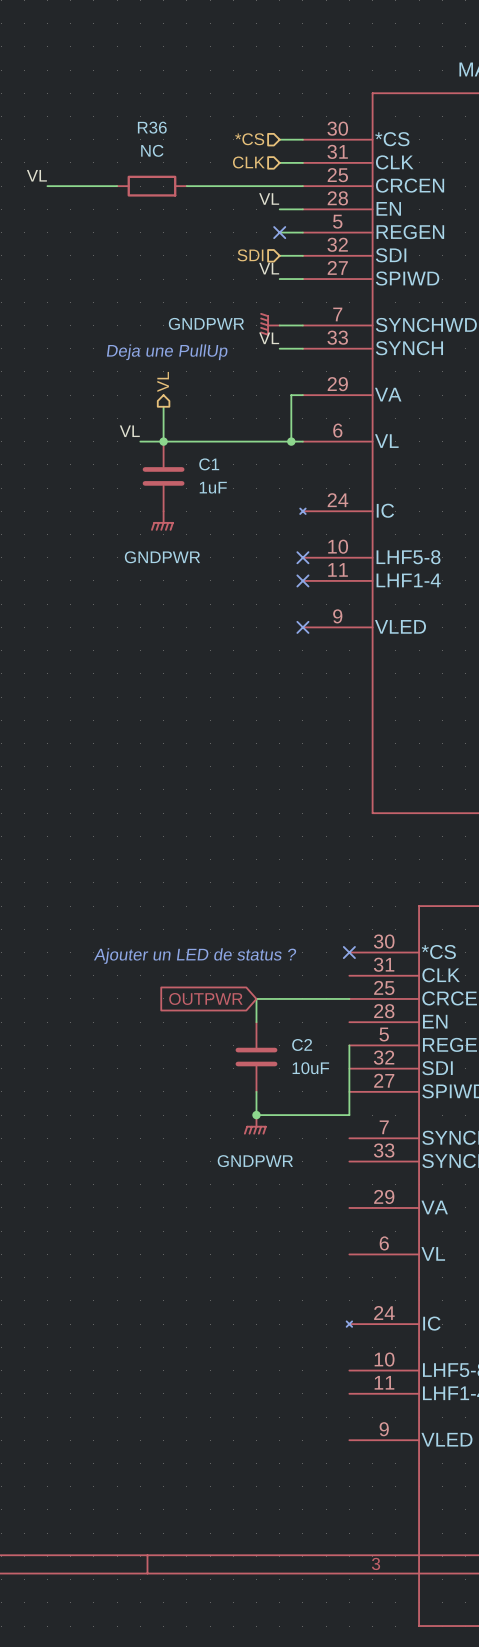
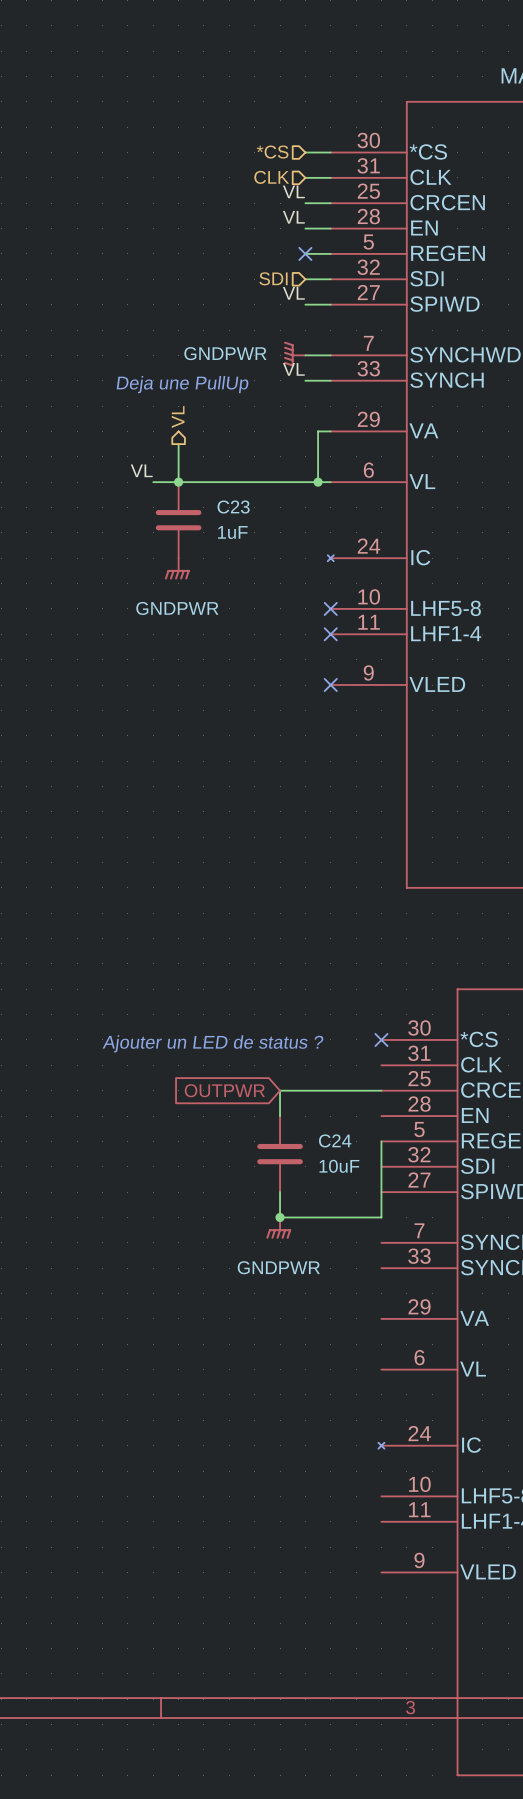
label: VL (36, 175) -> none
label: none -> VL (293, 191)
wire: (47, 186) (117, 186) -> none
R36: NC (151, 186) -> none
wire: (186, 186) (279, 186) -> none
C1 name: C1 (209, 464) -> C23 (233, 507)
C2 name: C2 (302, 1044) -> C24 (335, 1140)

